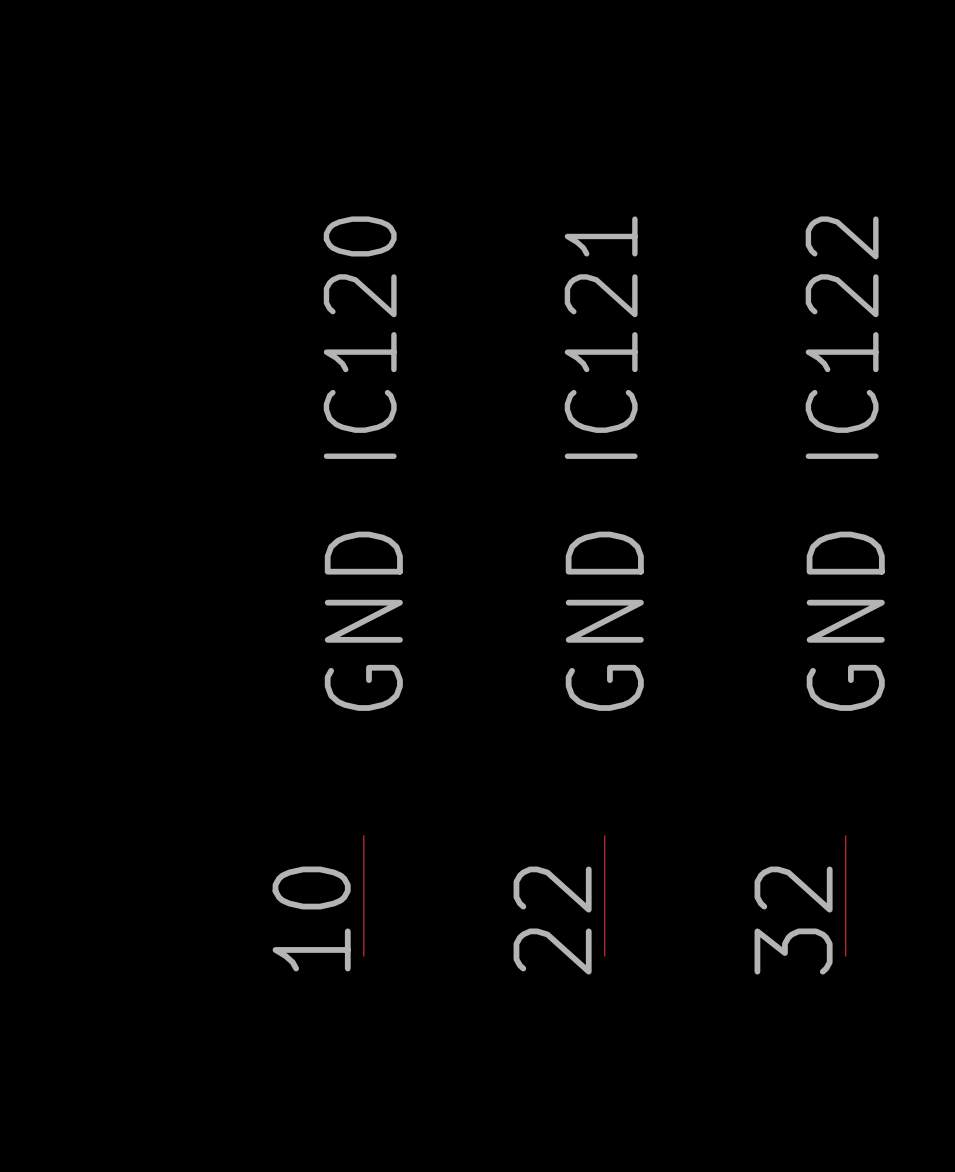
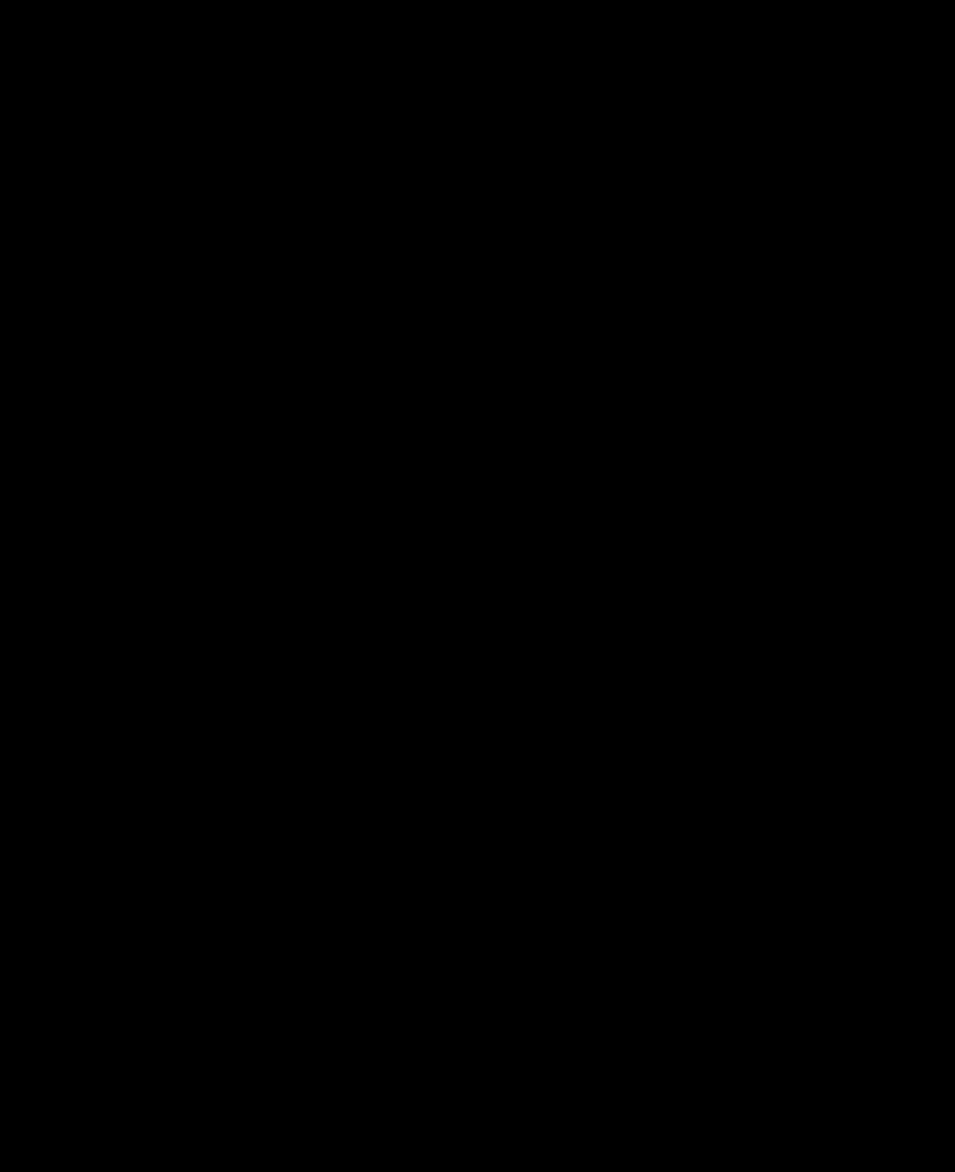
IC120: (363, 895) -> none
IC121: (604, 895) -> none
IC122: (845, 895) -> none

